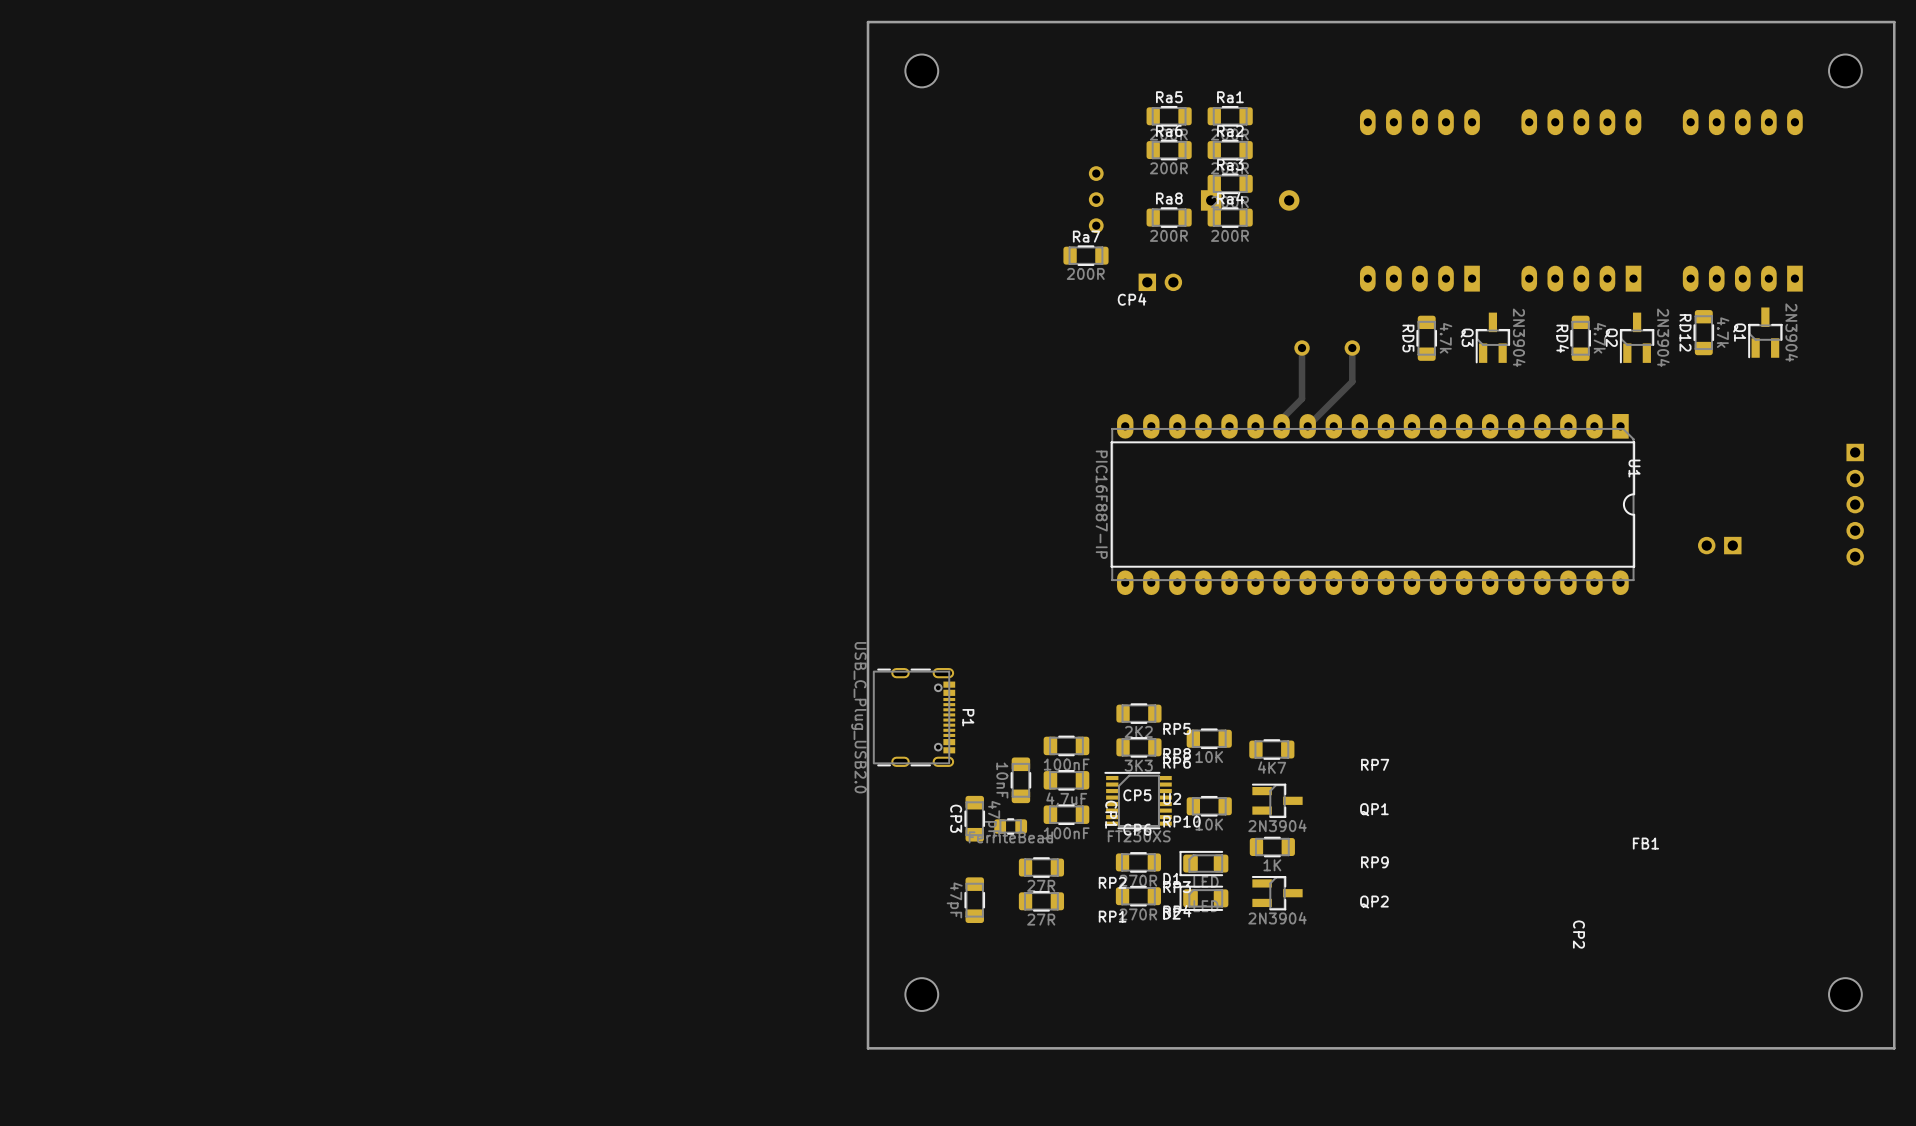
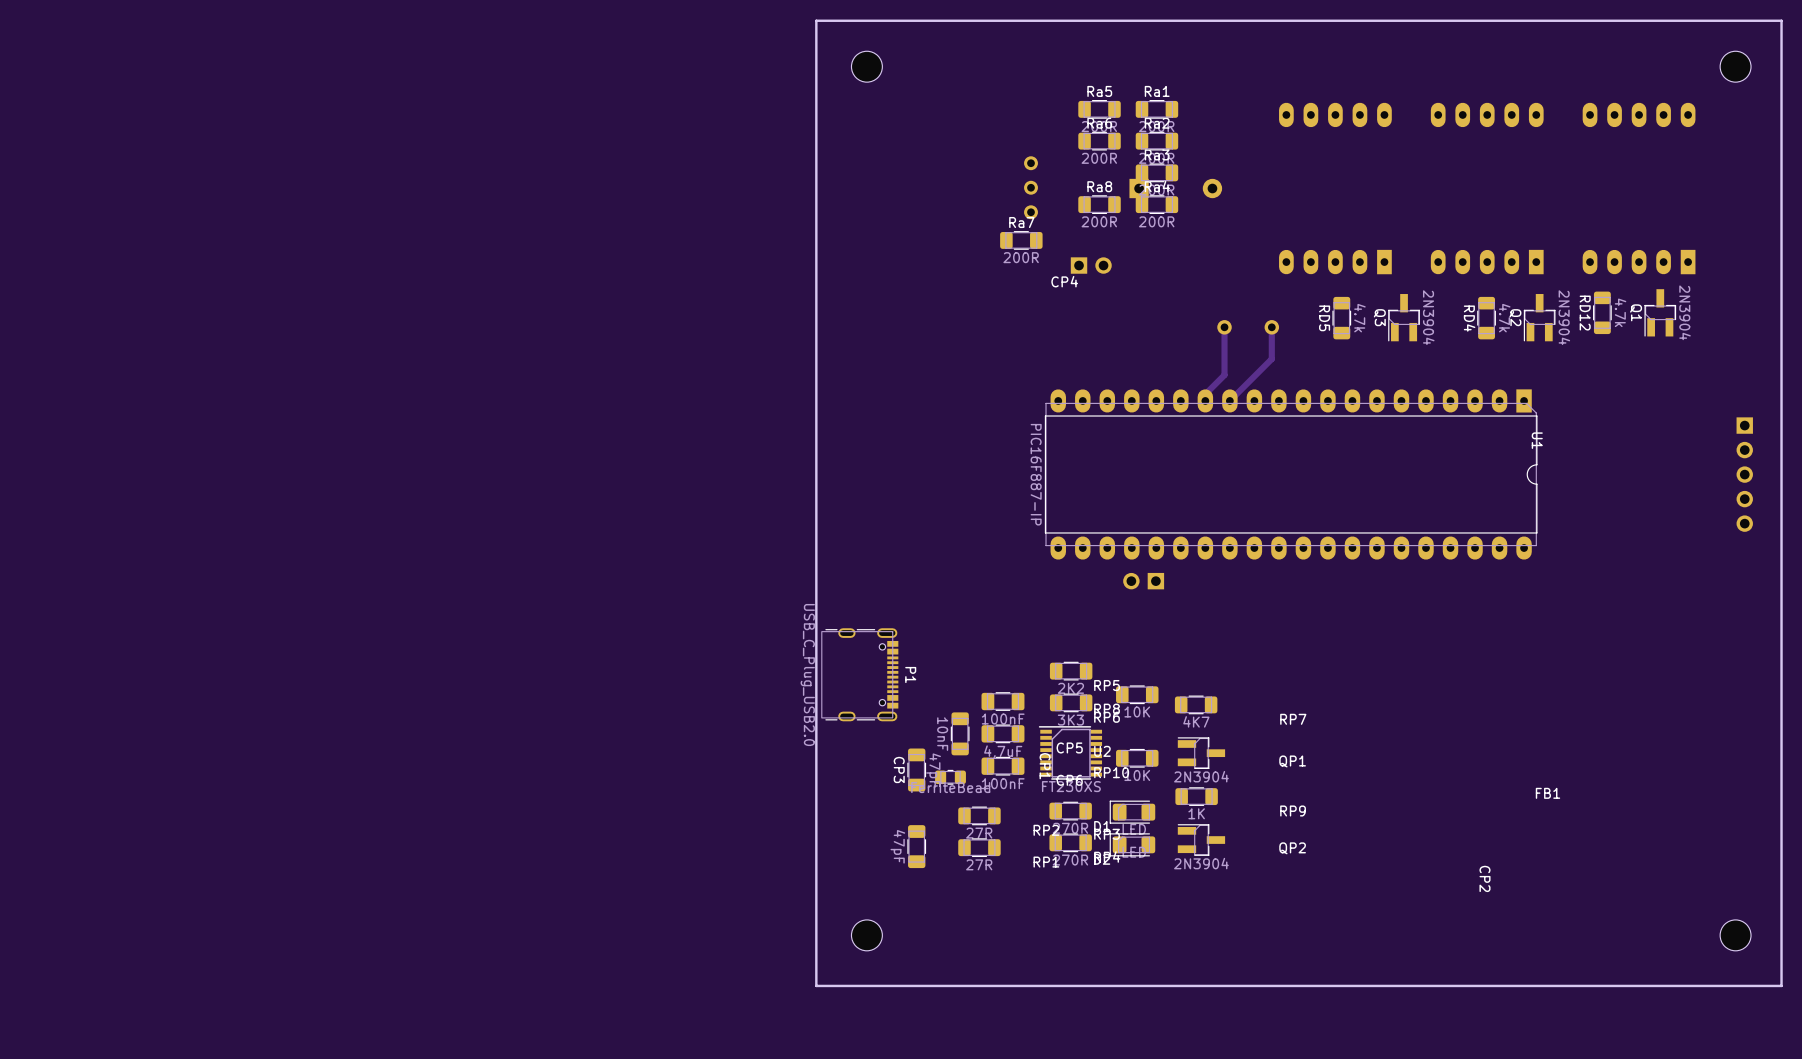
part: (1719, 545) -> none
part: none -> (1143, 581)

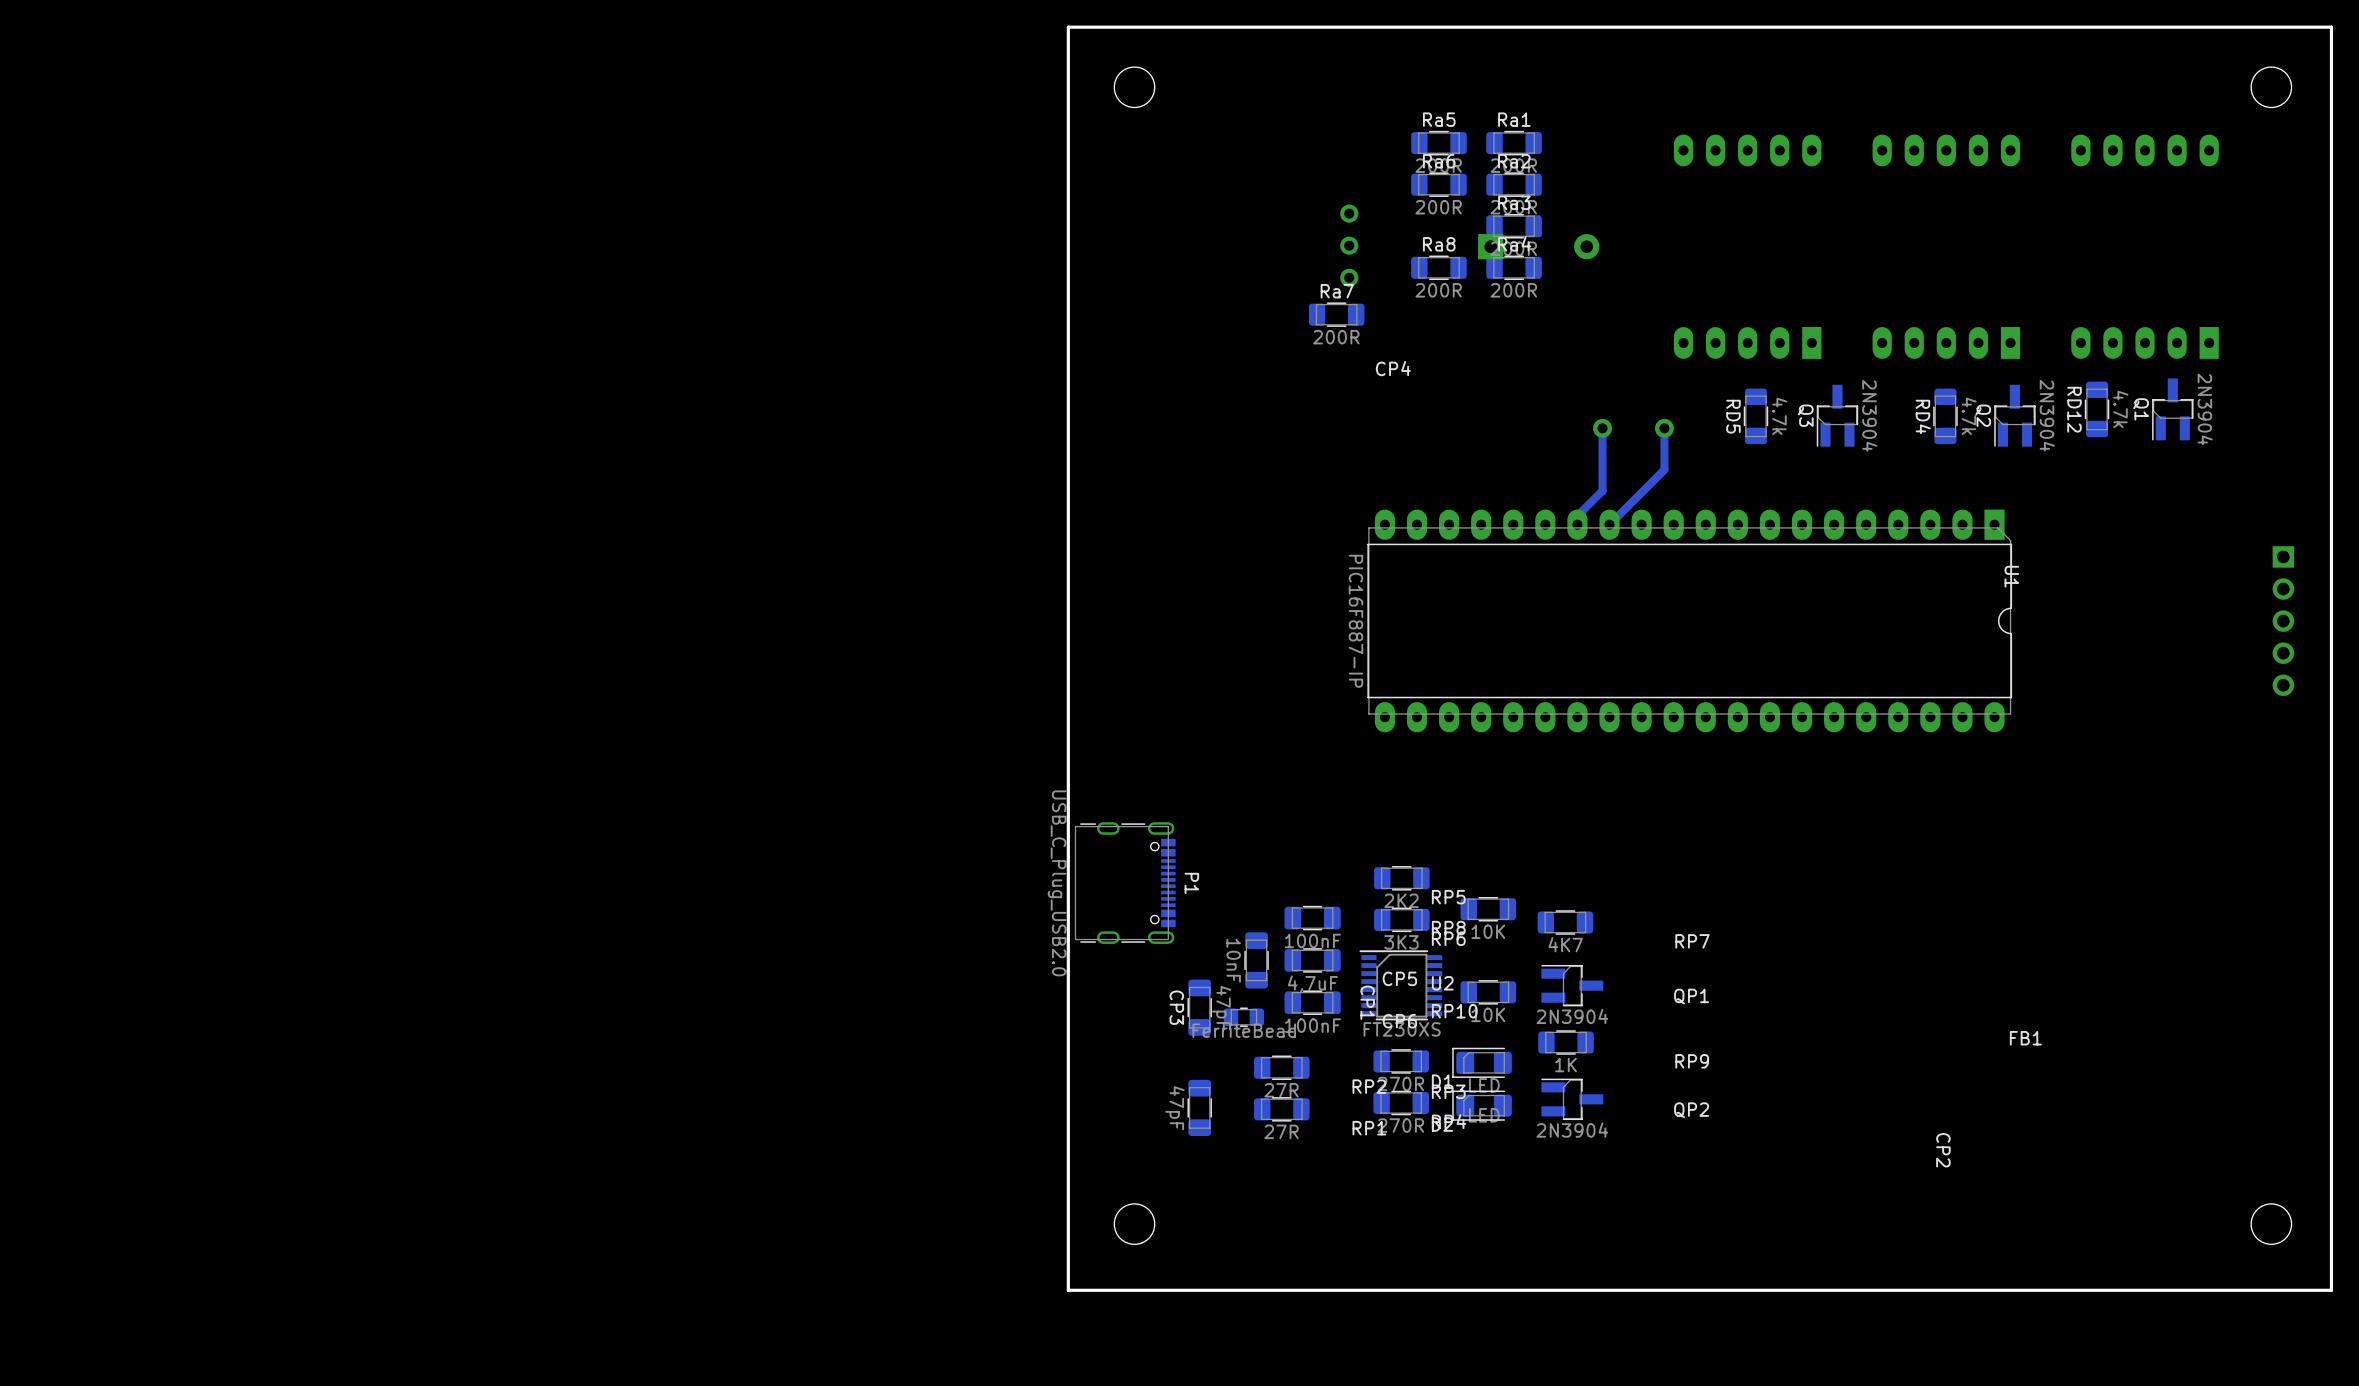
part: (1091, 265) -> none
part: (1143, 581) -> none

